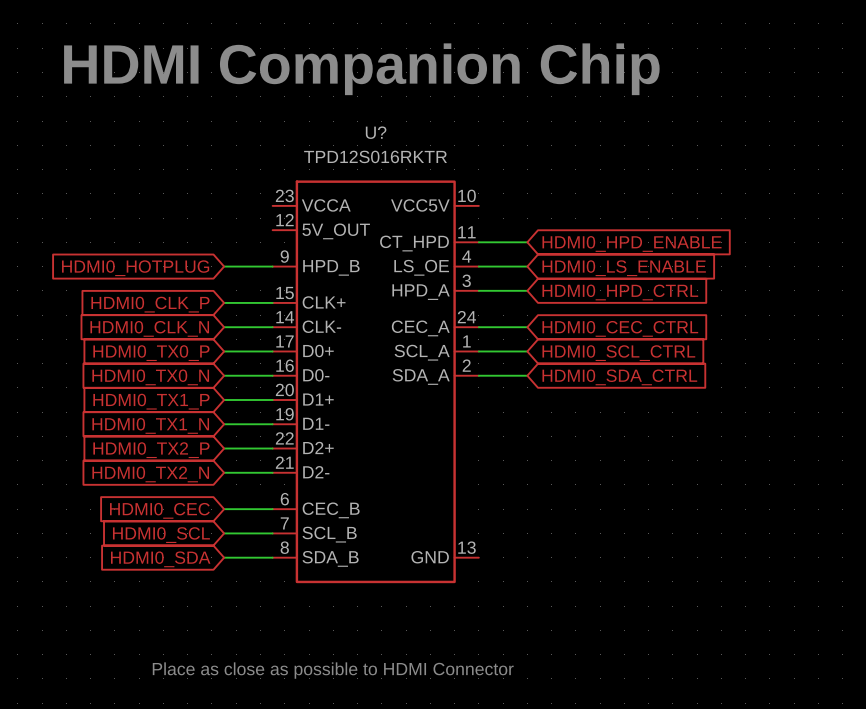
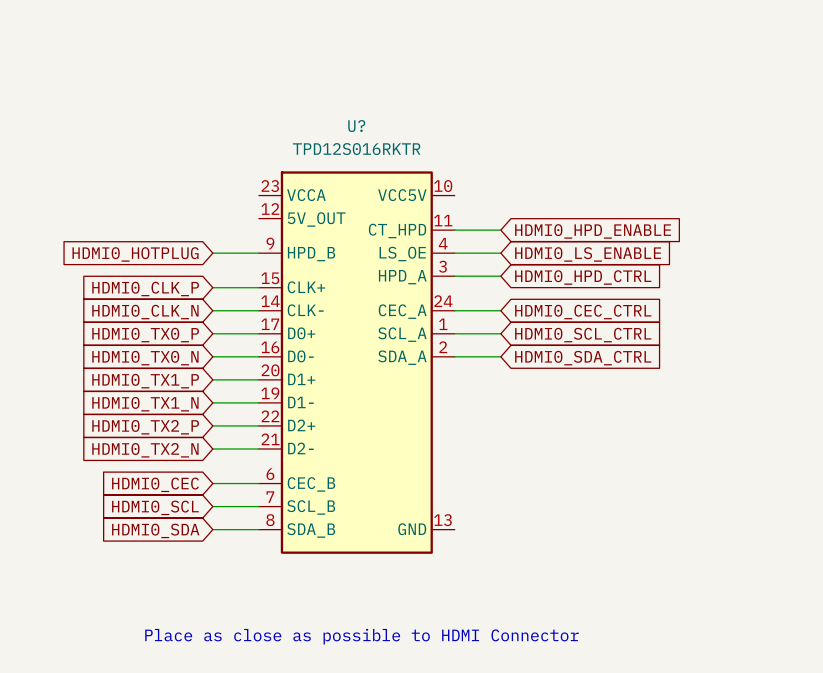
text: HDMI Companion Chip (361, 69) -> none

